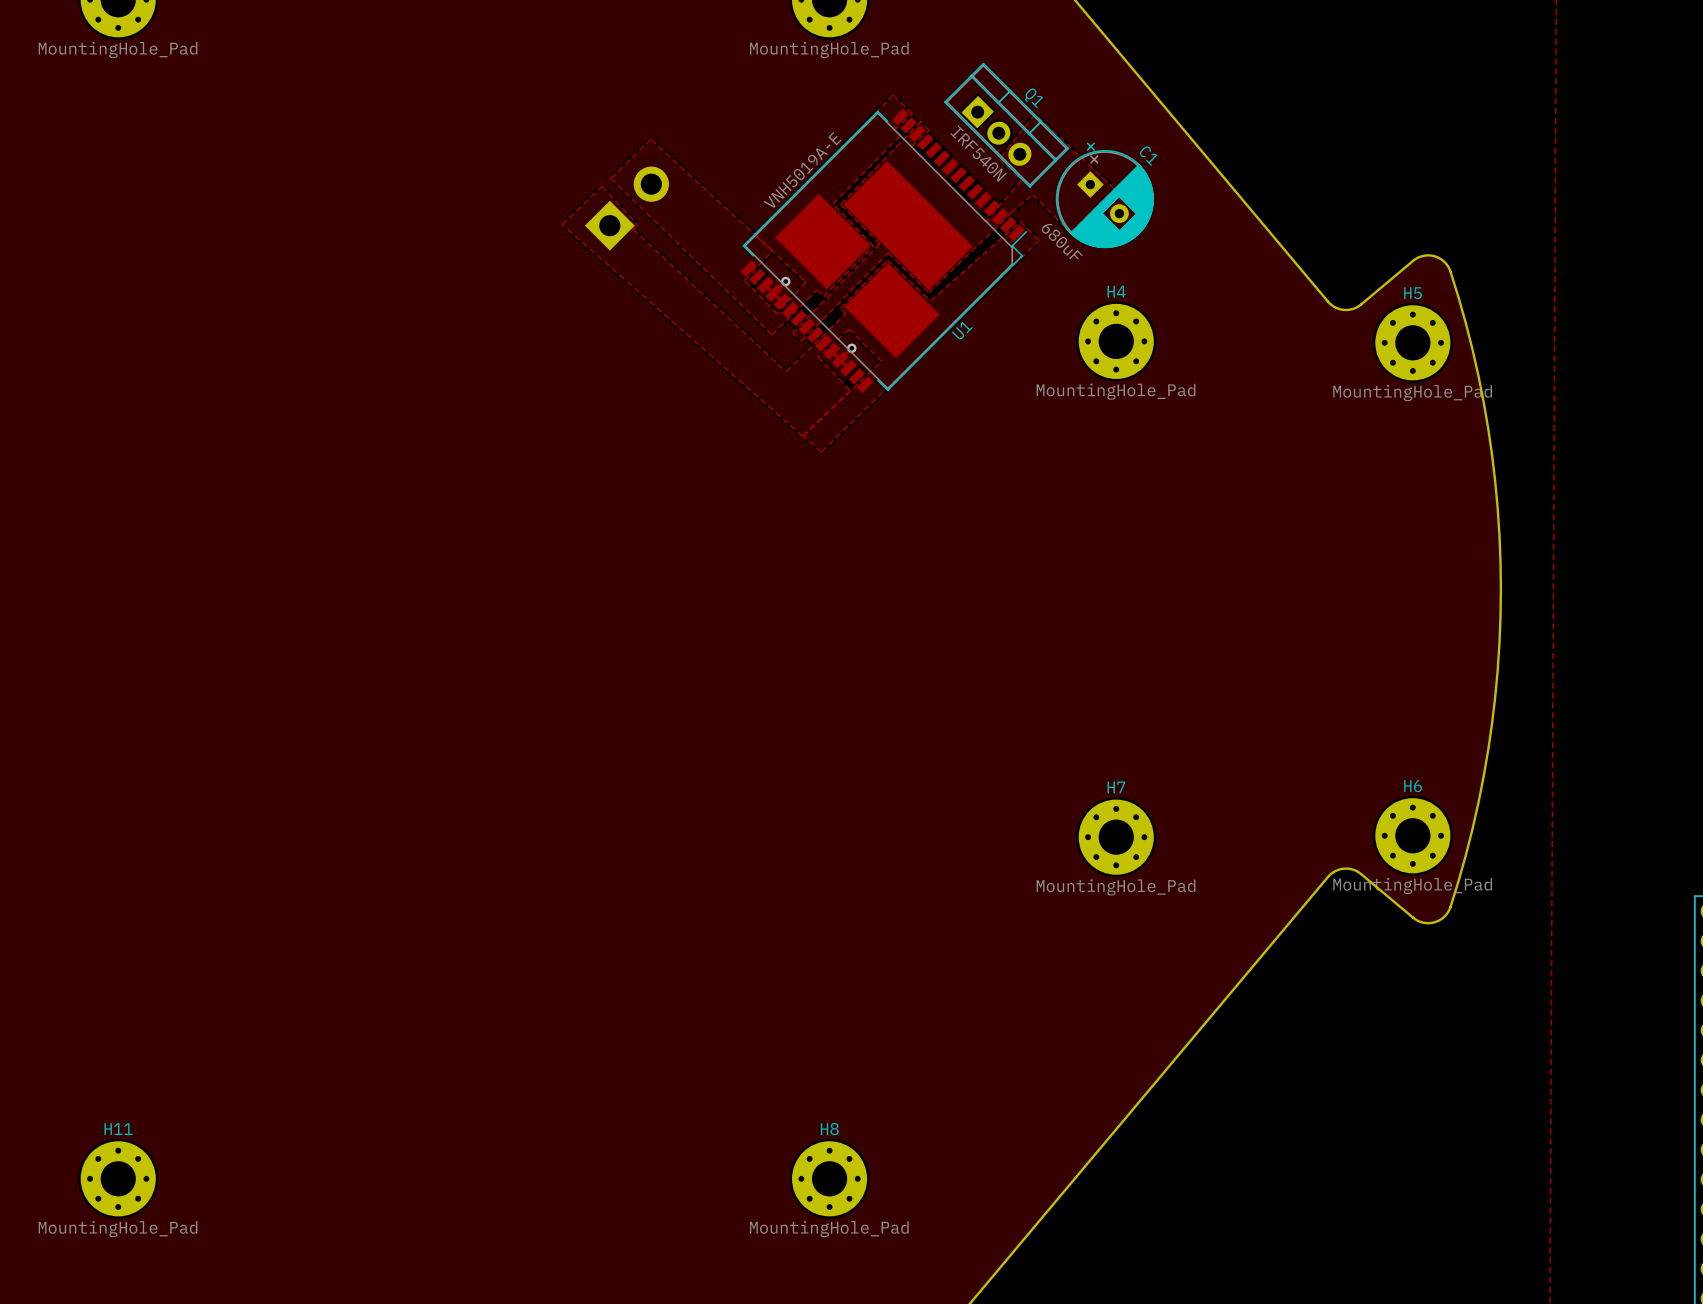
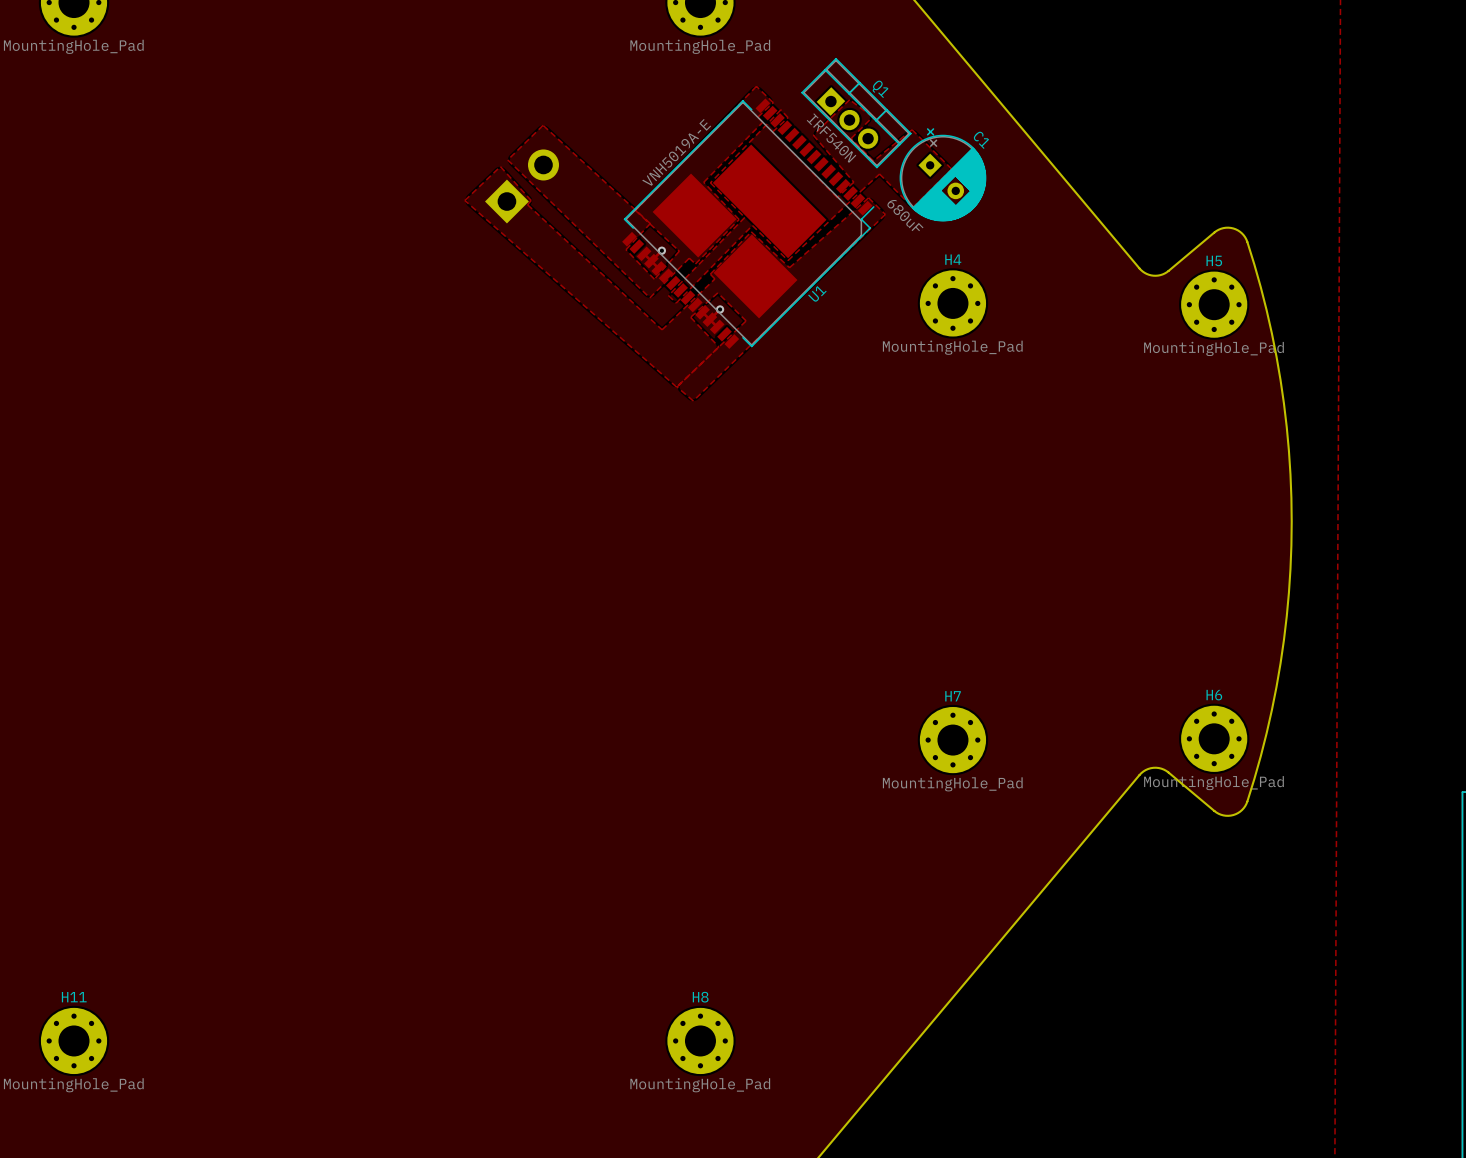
zone outline: (1035, 113) (1114, 188) (1070, 232) (1032, 194) (928, 292) (888, 252) (801, 340) (793, 332) (879, 243) (840, 204) (920, 121) (928, 130) (911, 146) (985, 221) (1021, 180) (999, 159) (1035, 113) -> none
zone outline: none -> (837, 197) (853, 182) (813, 135) (849, 99) (872, 117) (851, 138) (873, 161) (912, 129) (951, 168) (912, 207) (879, 174) (788, 260) (752, 225) (676, 303) (668, 295) (744, 217) (710, 182) (780, 109) (788, 117) (772, 131) (837, 197)

